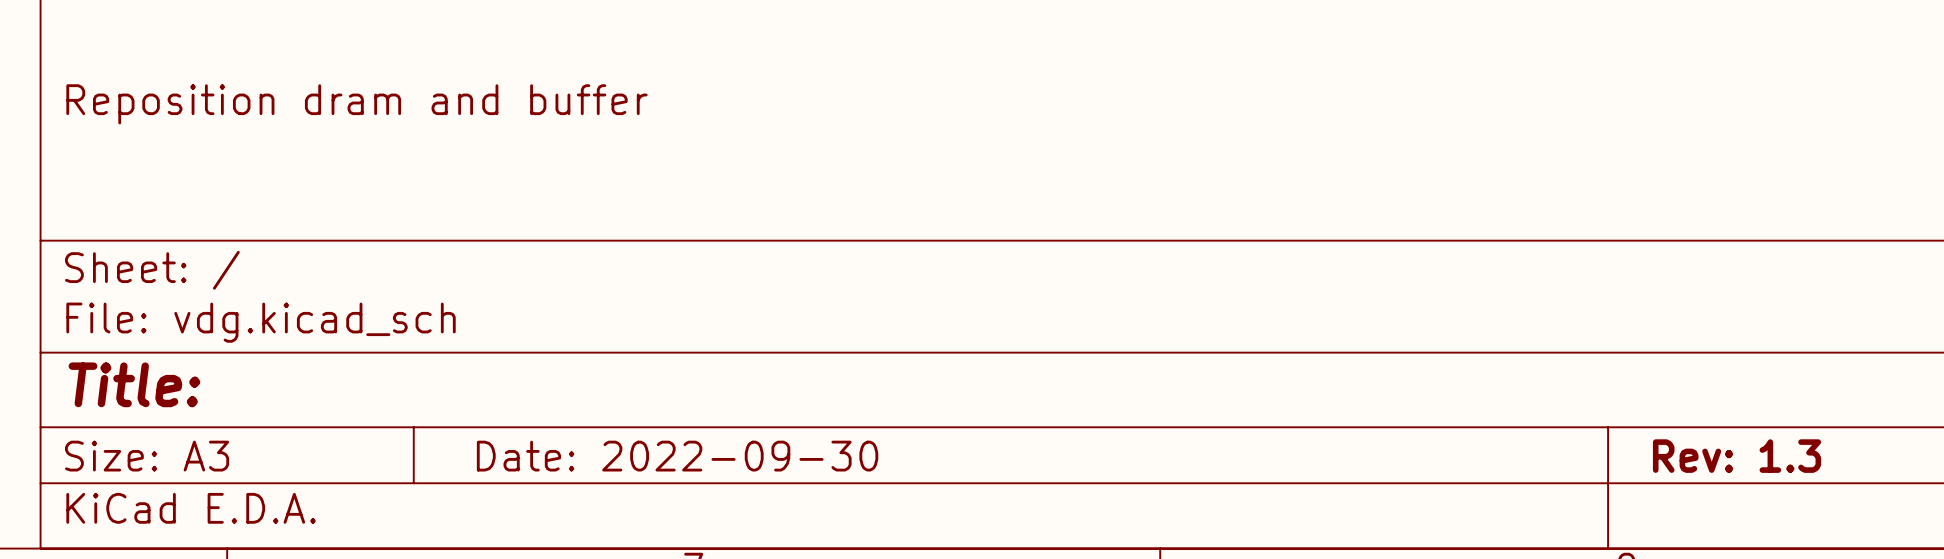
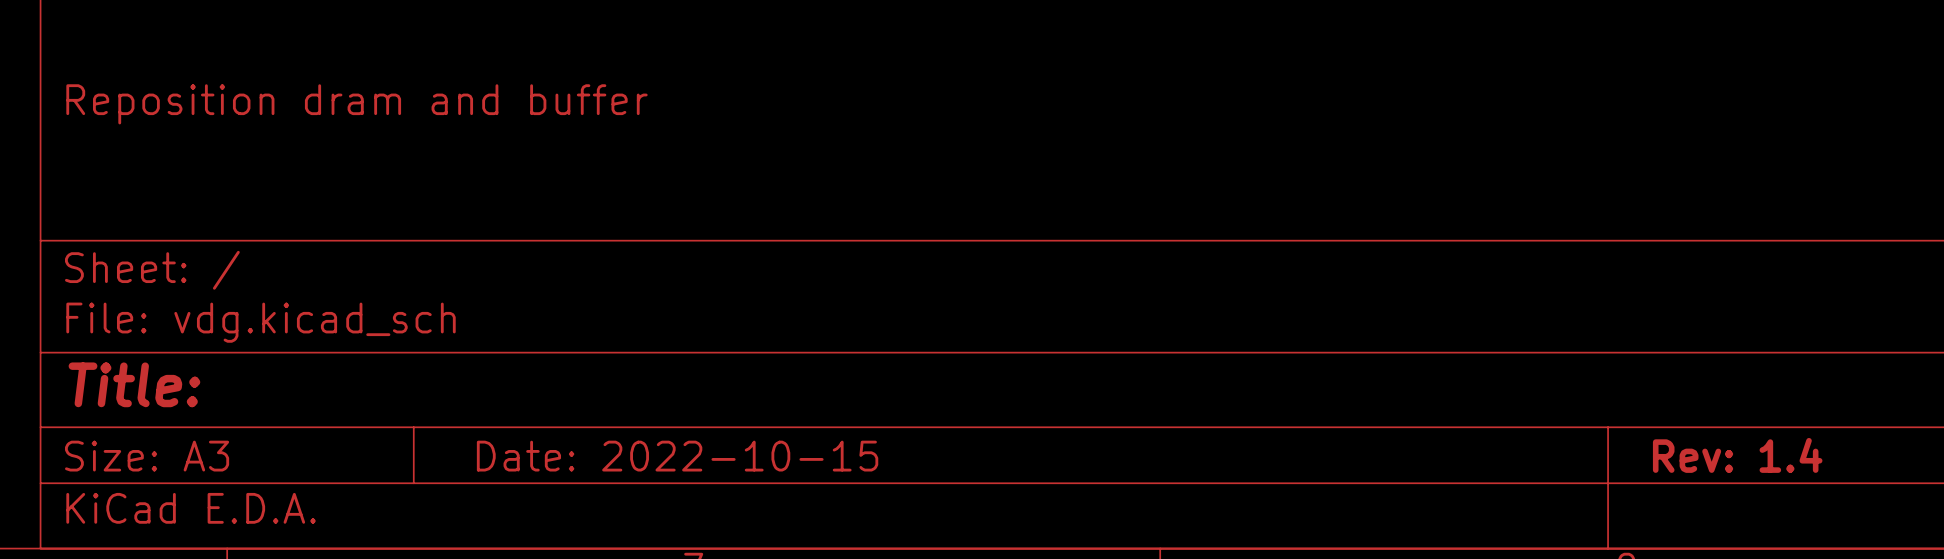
title block: Date: 2022-09-30 (677, 456) -> Date: 2022-10-15 (677, 456)
title block: Rev: 1.3 (1737, 456) -> Rev: 1.4 (1737, 455)

